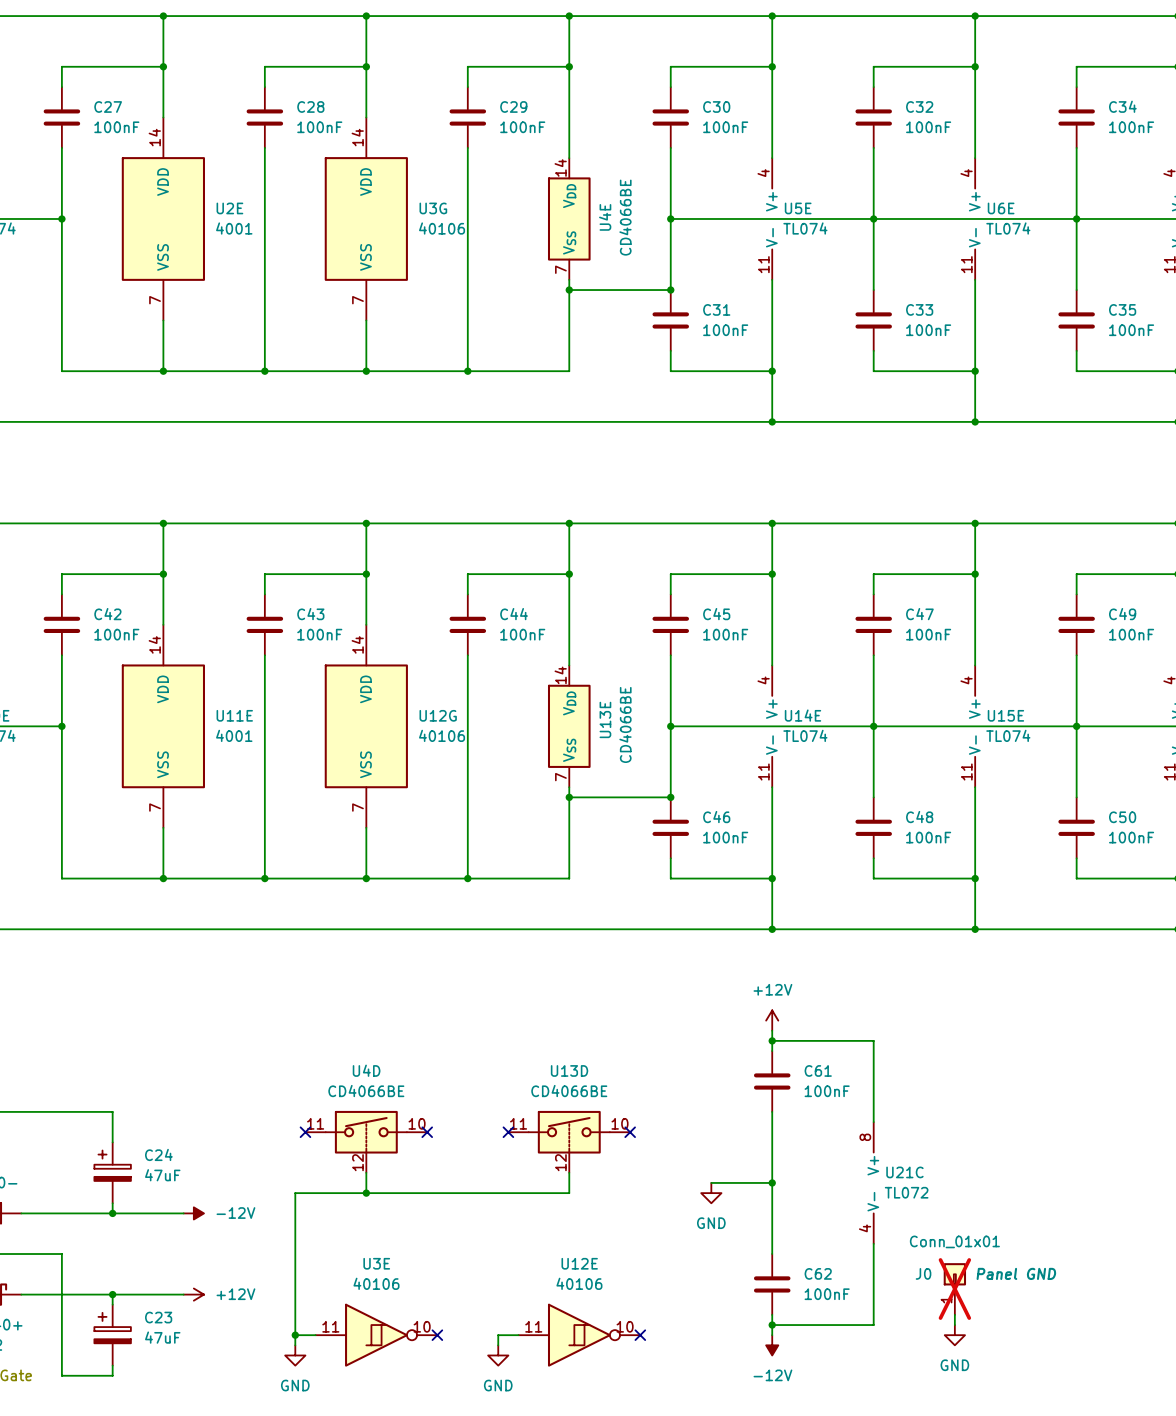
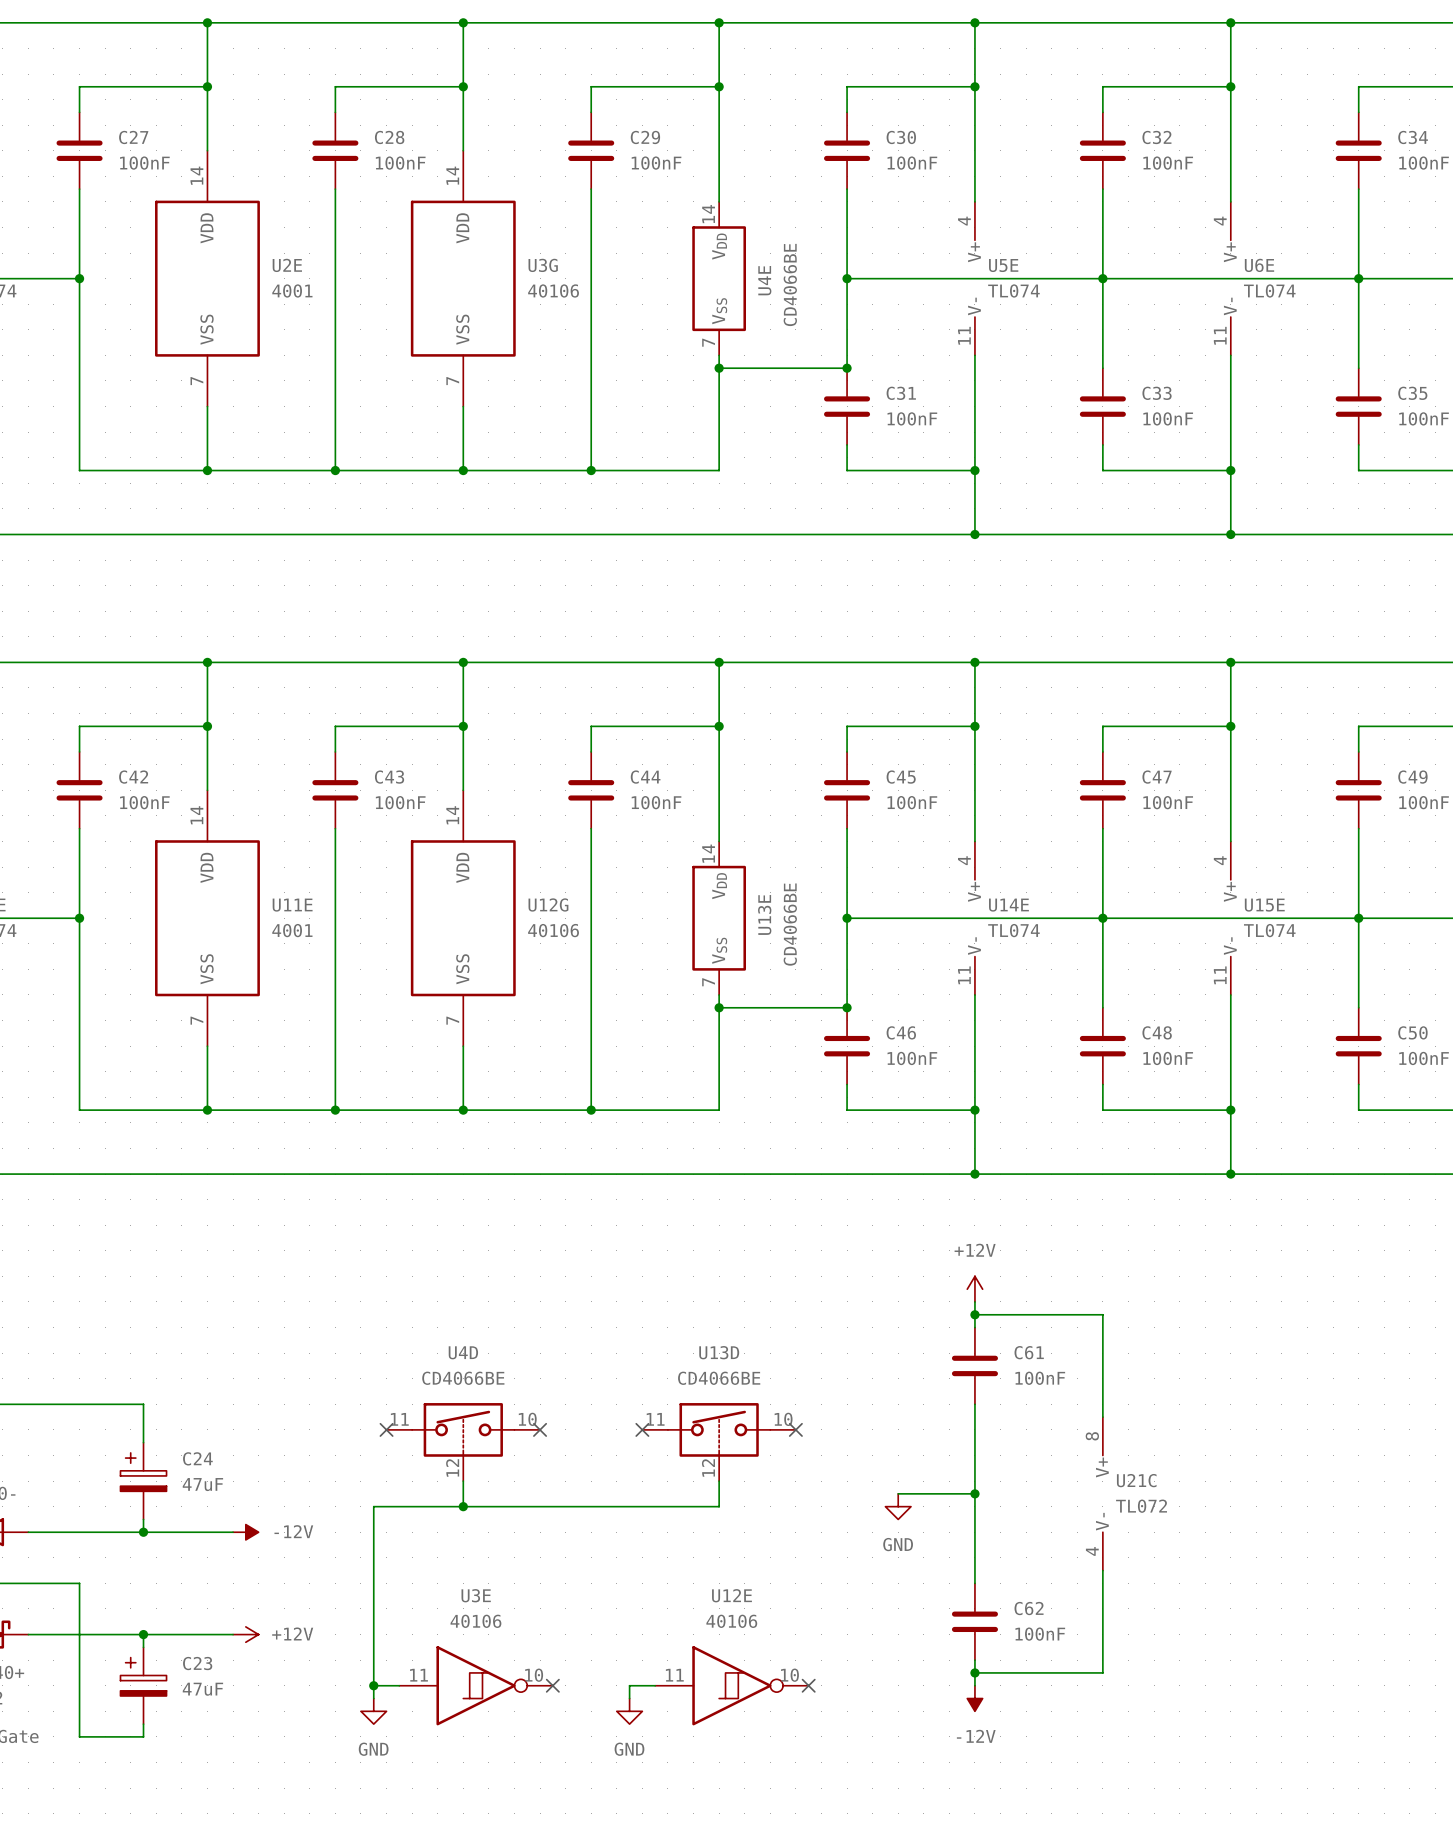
J0: Conn_01x01 (954, 1289) -> none
wire: (954, 1314) (954, 1325) -> none
power symbol: GND (954, 1335) -> none

